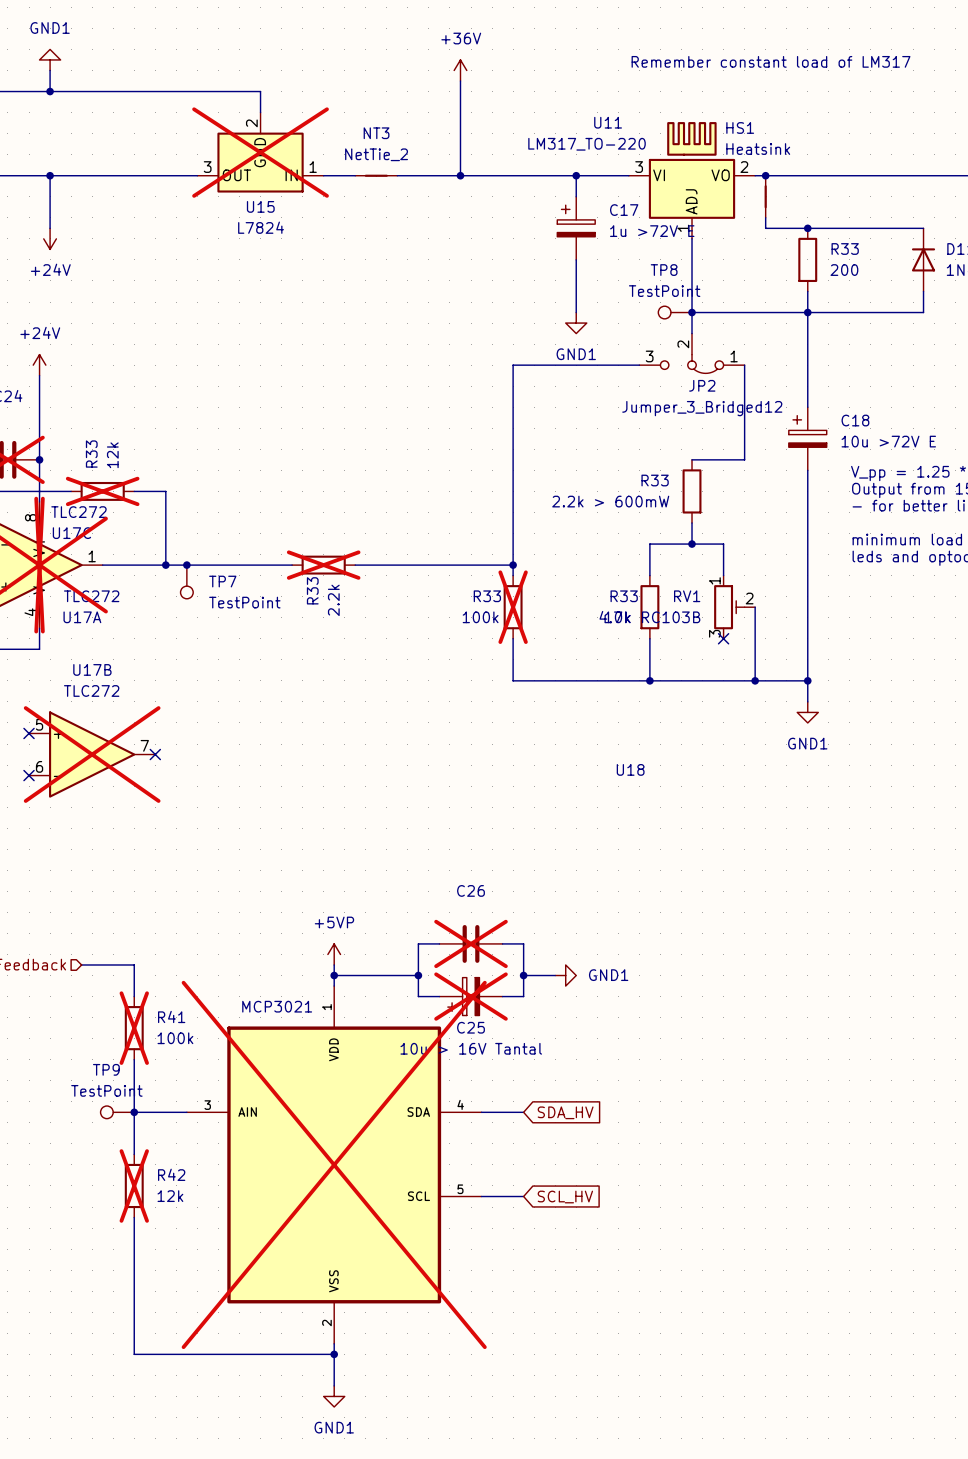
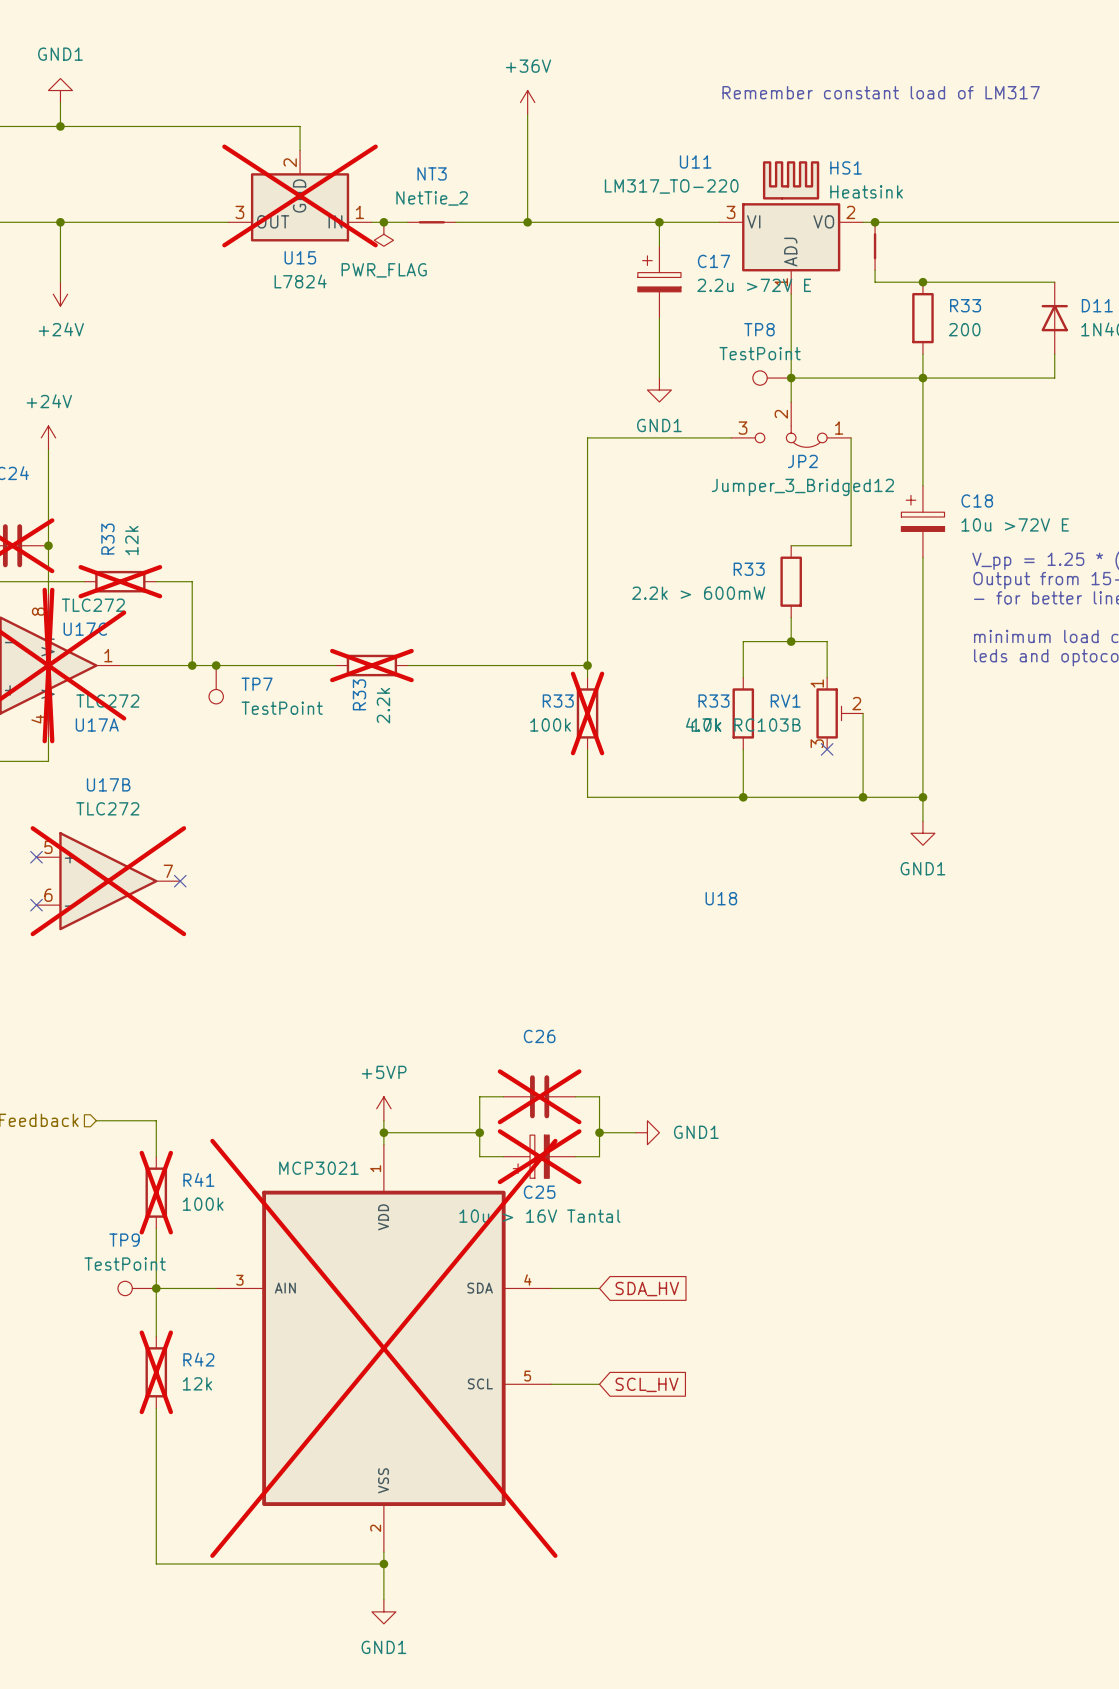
junction: none -> (383, 222)
power symbol: none -> PWR_FLAG (383, 234)
C17 value: 1u >72V E (652, 231) -> 2.2u >72V E (754, 285)

